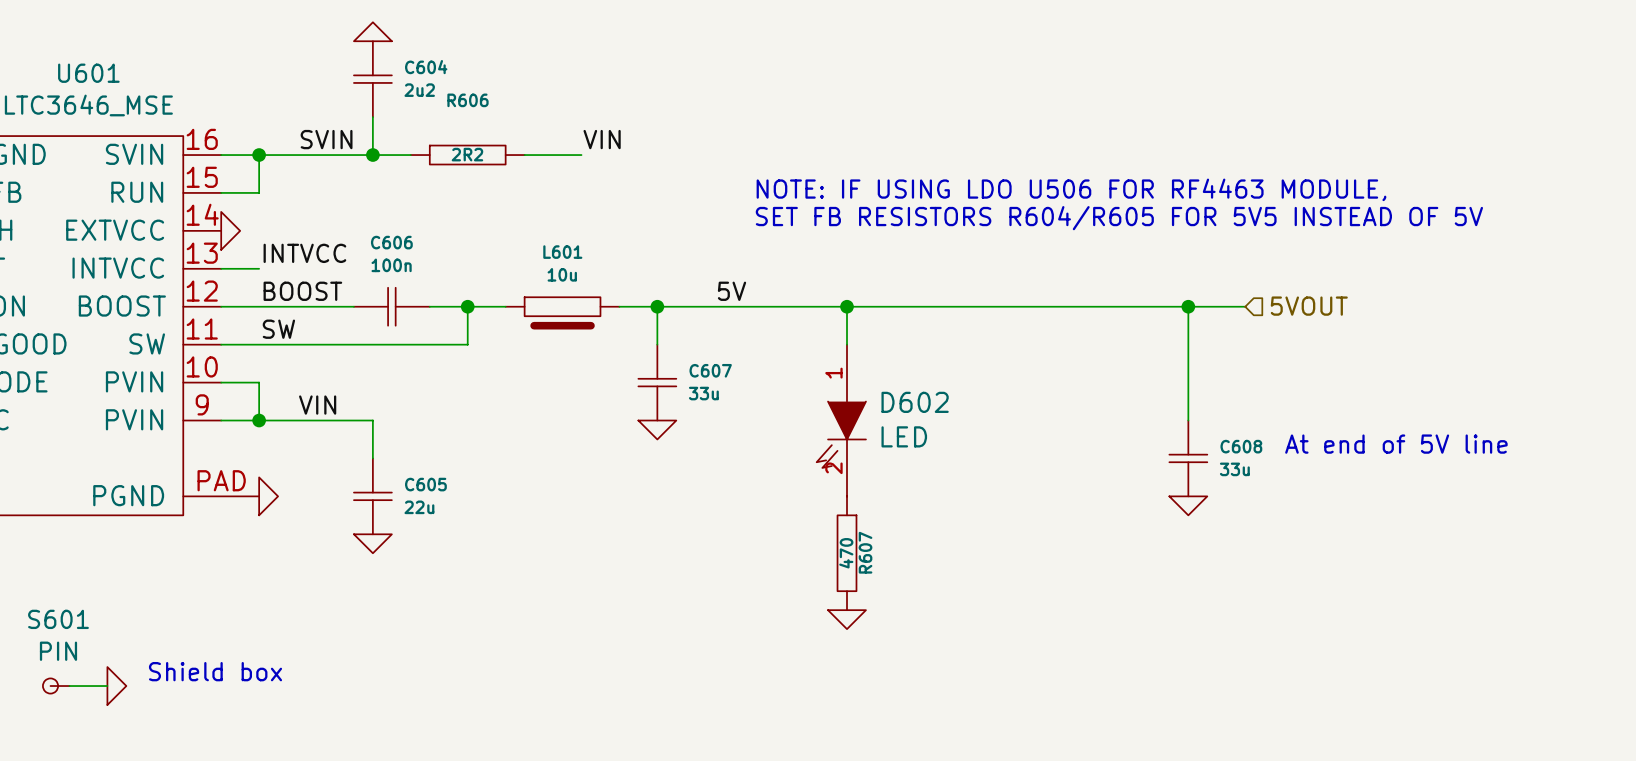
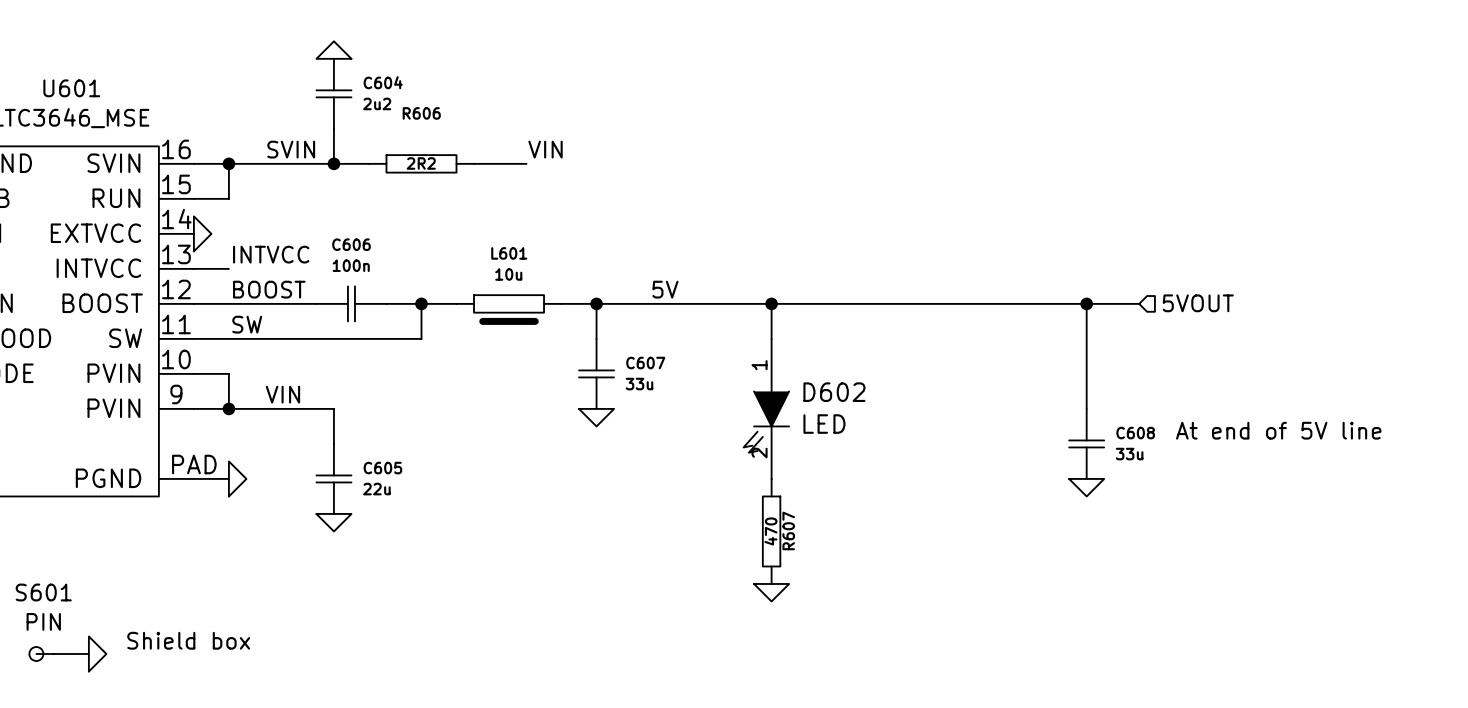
text: NOTE: IF USING LDO U506 FOR RF4463 MODULE, (1071, 189) -> none
text: SET FB RESISTORS R604/R605 FOR 5V5 INSTEAD OF 5V (1119, 218) -> none

